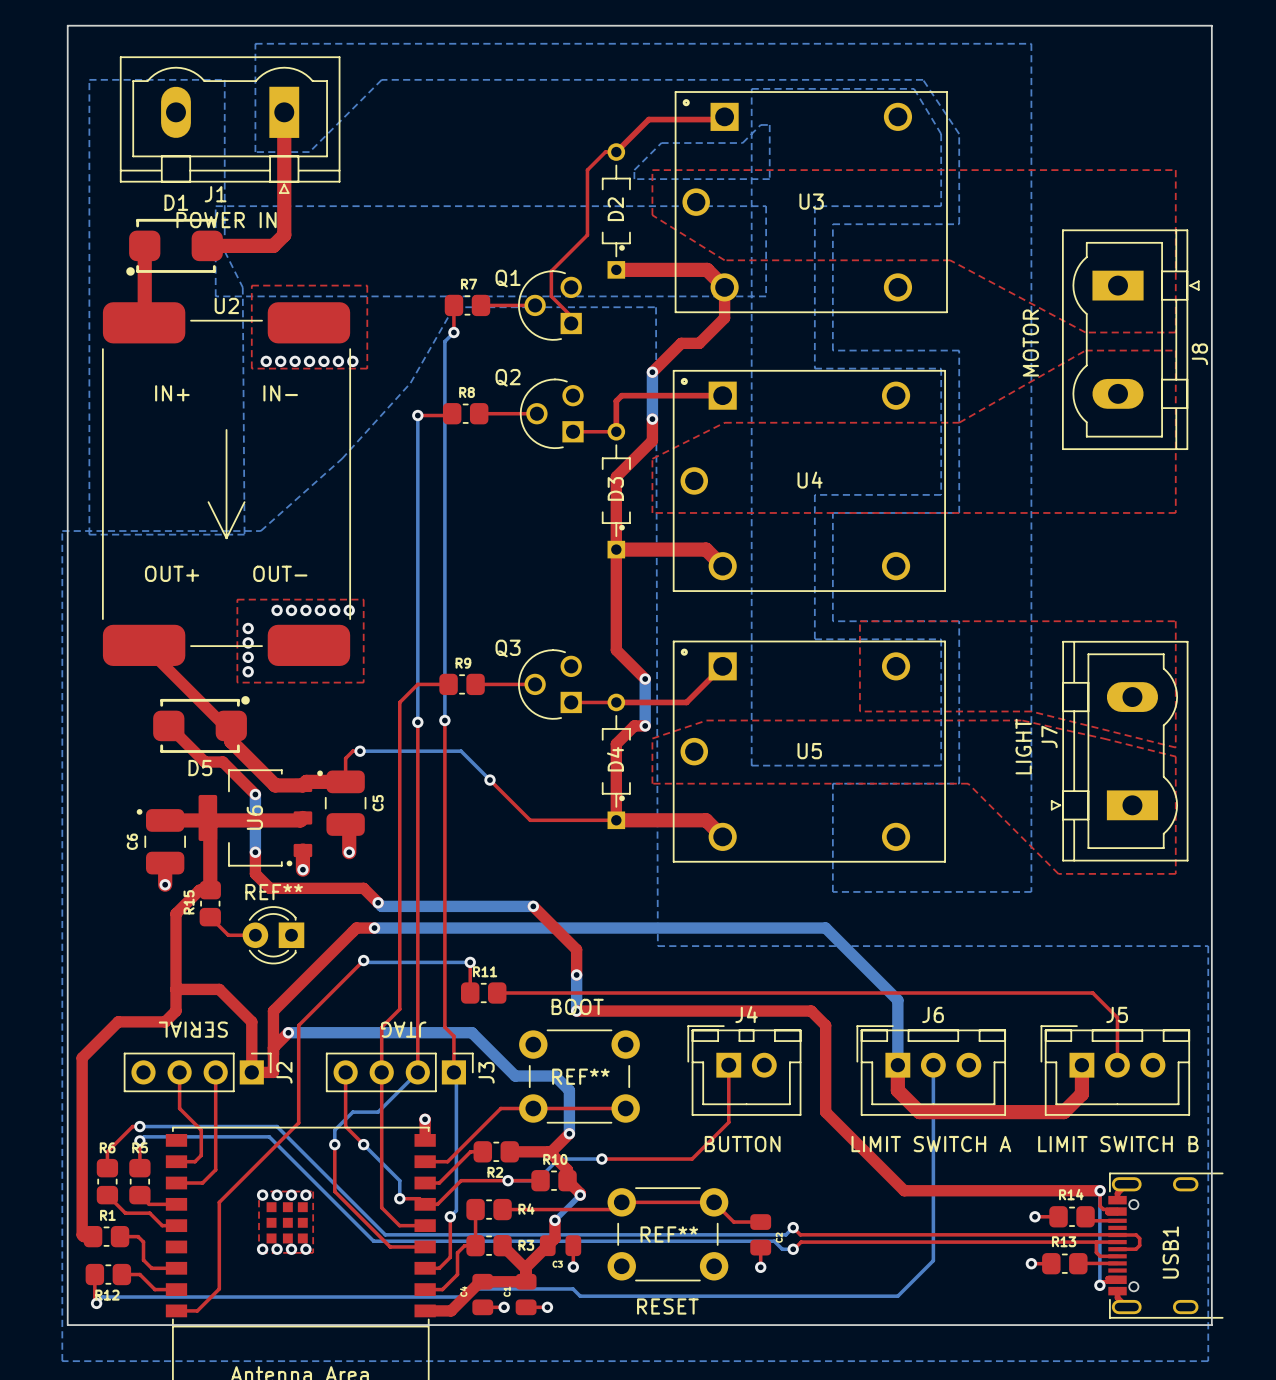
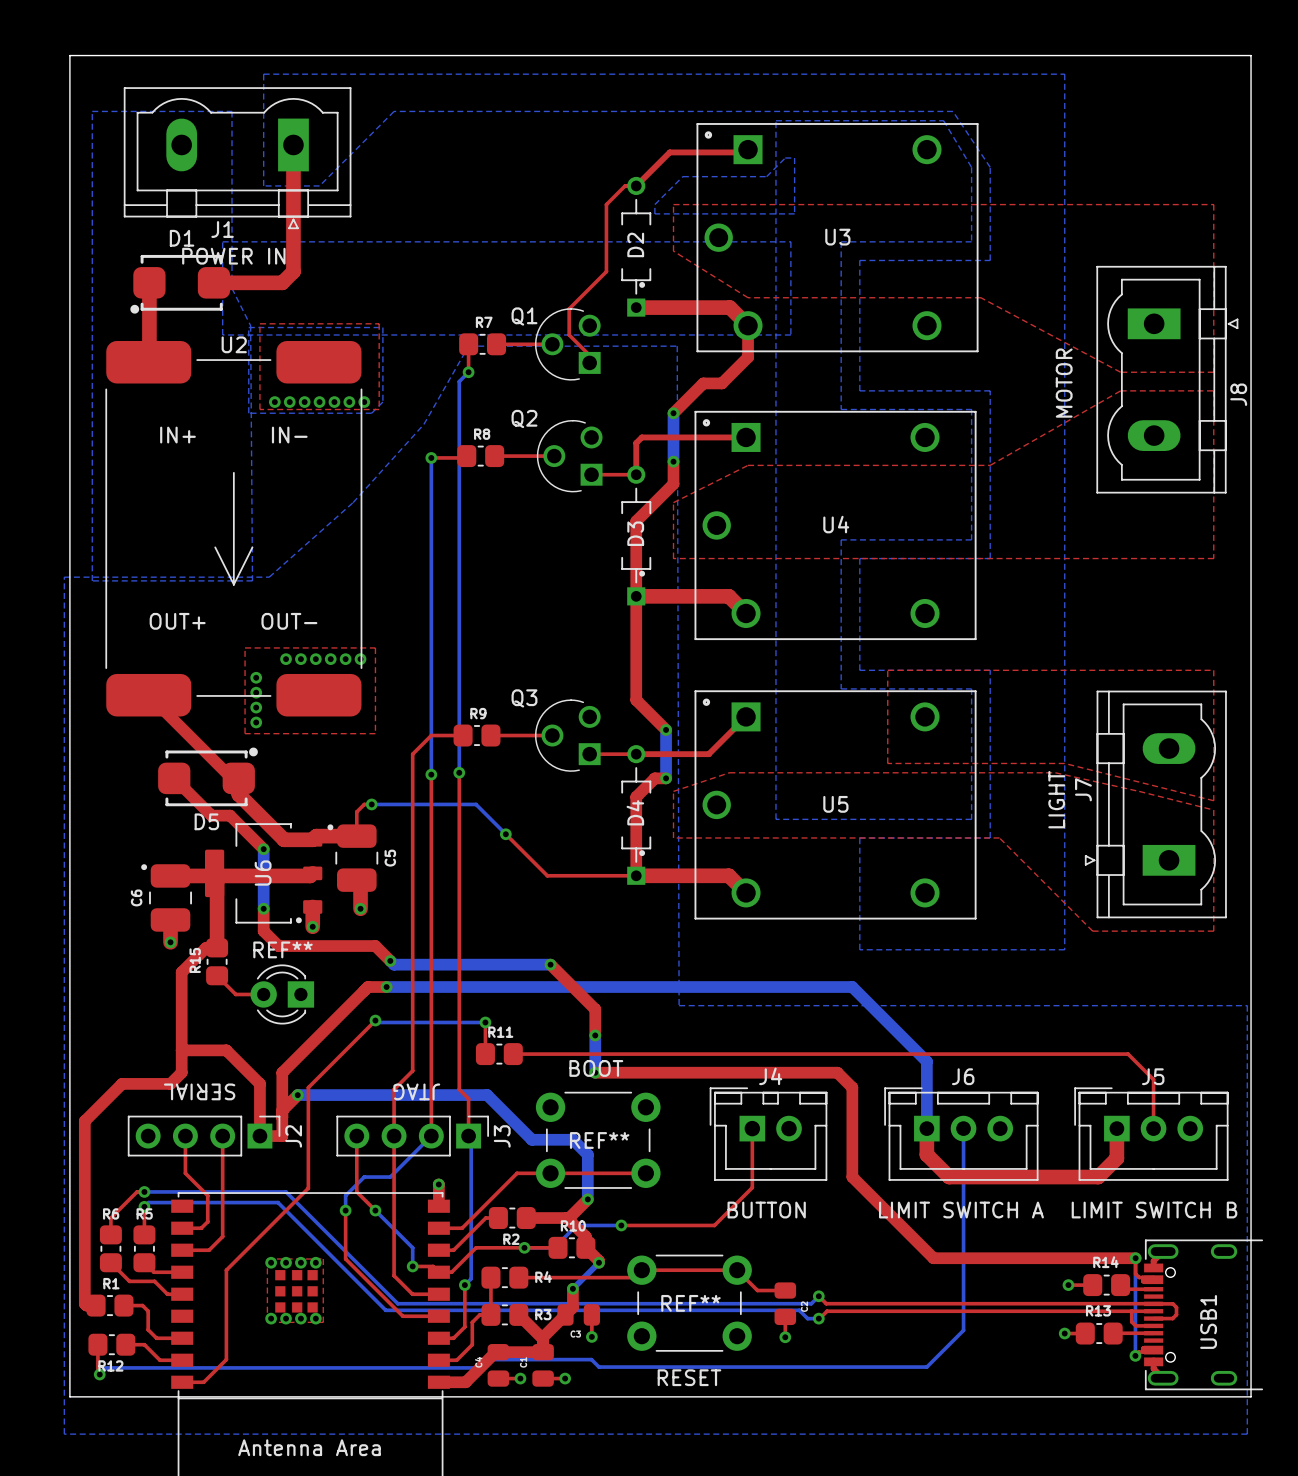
bottom zone outline: none -> (248, 327) (248, 413) (371, 413) (382, 402) (382, 327) (248, 327)

